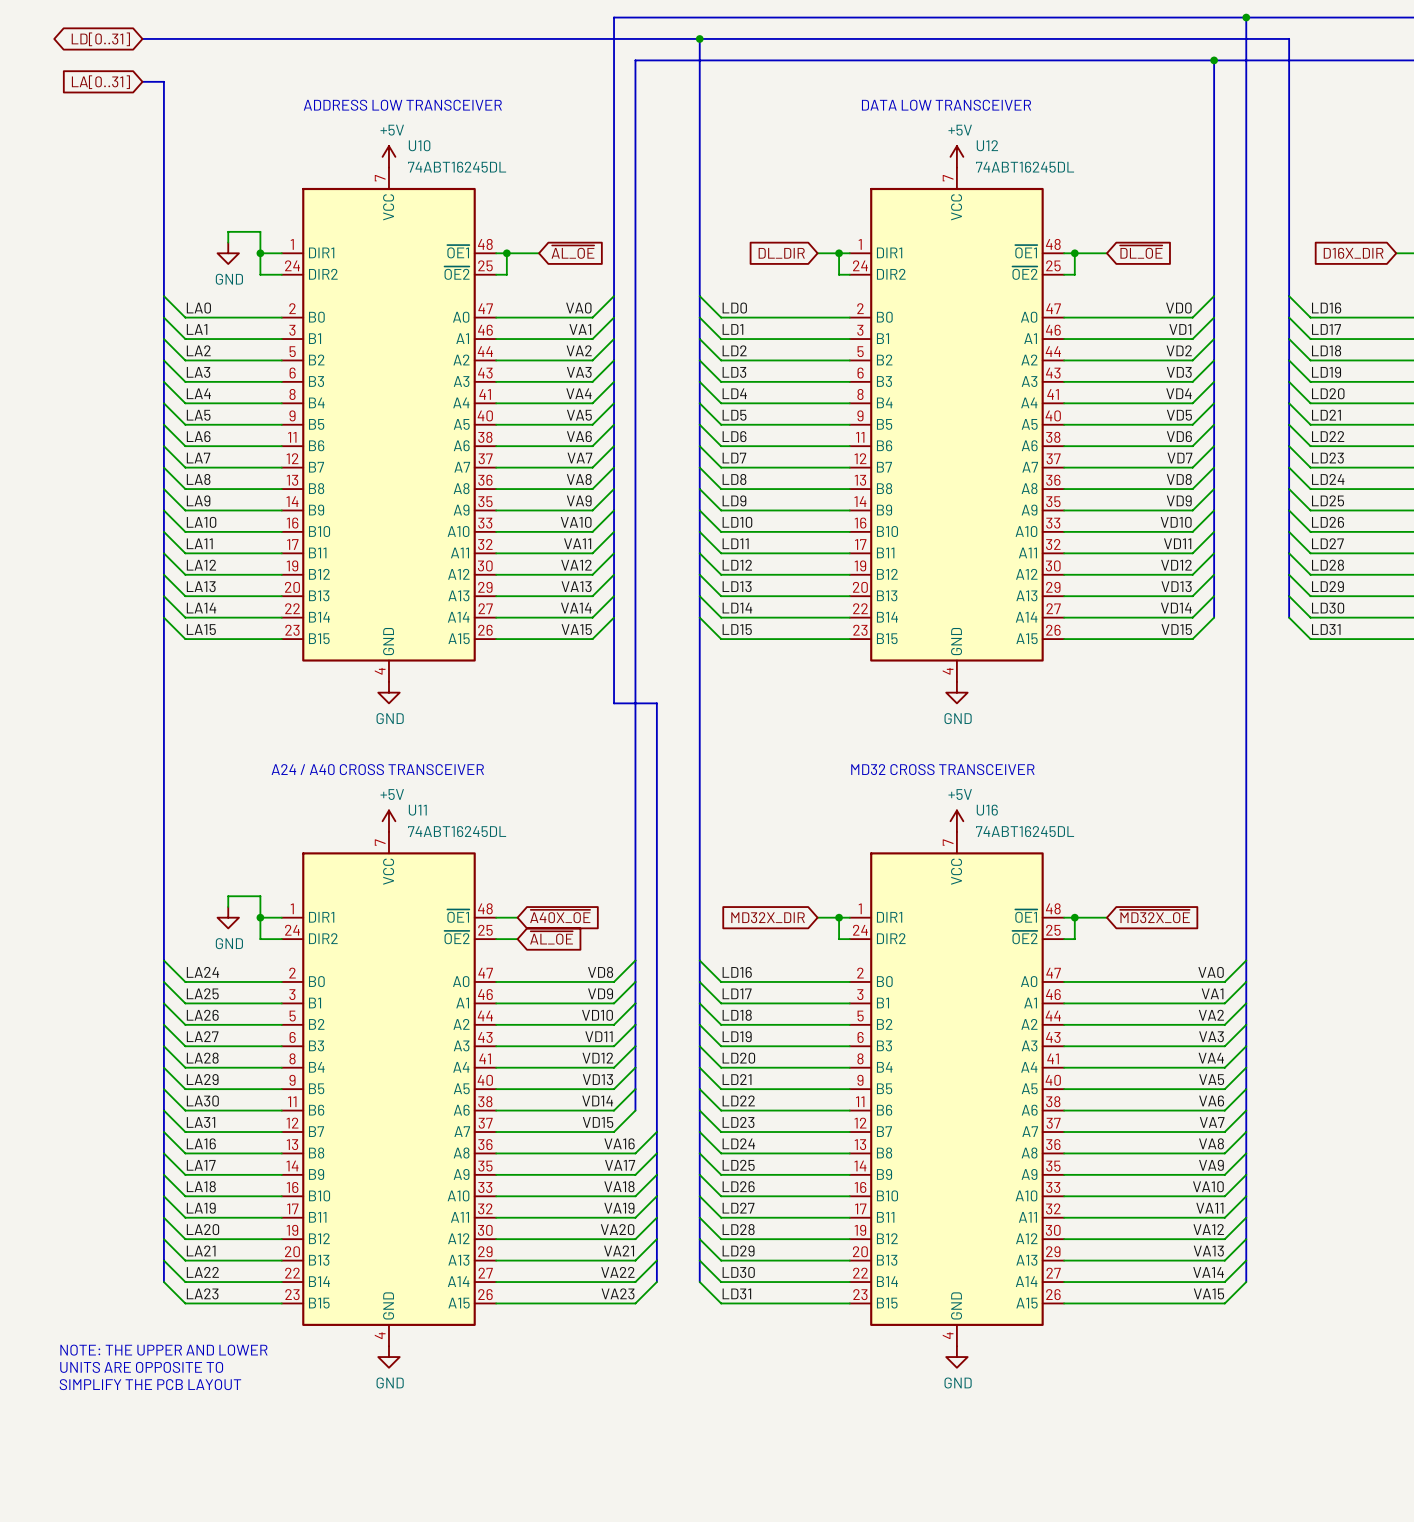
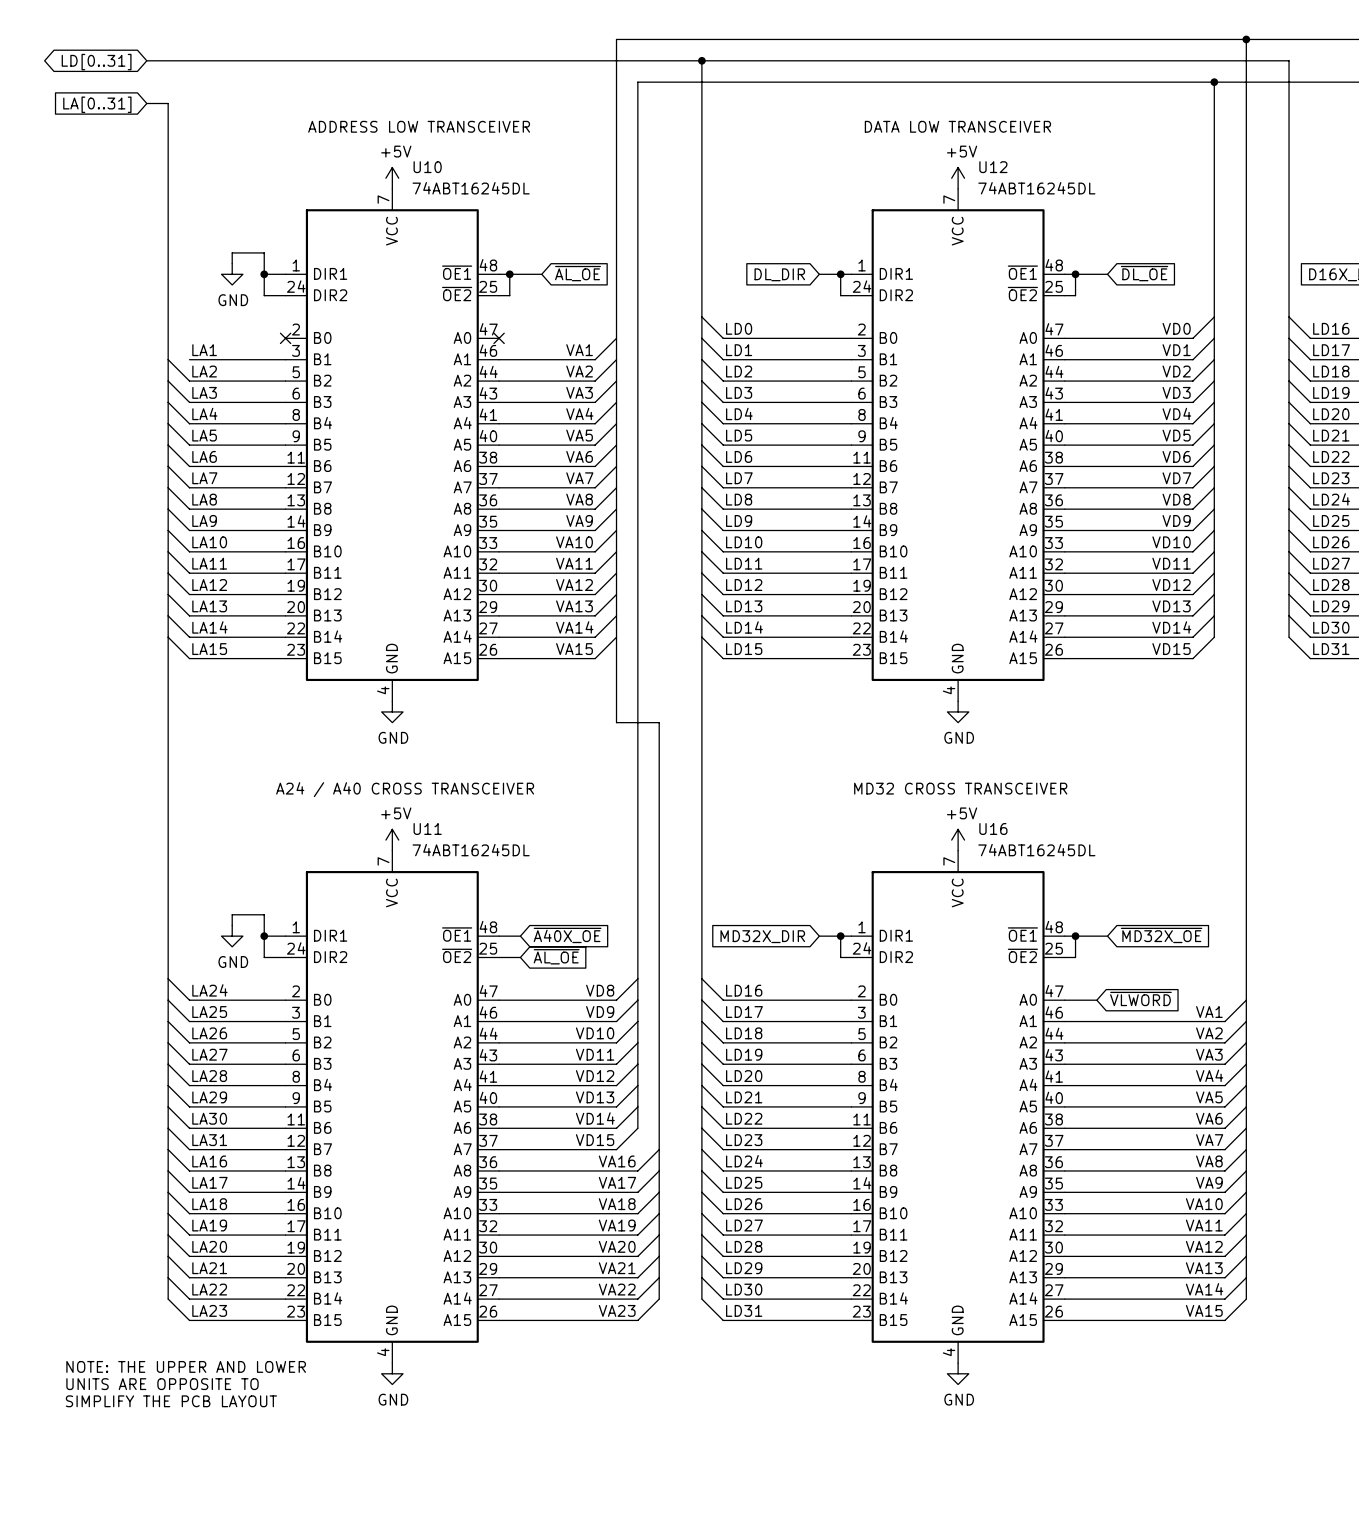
wire: (163, 296) (185, 317) (281, 317) -> none
wire: (614, 296) (592, 317) (496, 317) -> none
label: LA0 (198, 308) -> none
label: VA0 (578, 308) -> none
wire: (163, 317) (185, 339) -> none
no-connect mark: none -> (285, 338)
no-connect mark: none -> (499, 338)
wire: (1246, 960) (1224, 981) (1096, 981) -> none
label: VA0 (1211, 972) -> none
global label: none -> ~{VLWORD} (1140, 998)

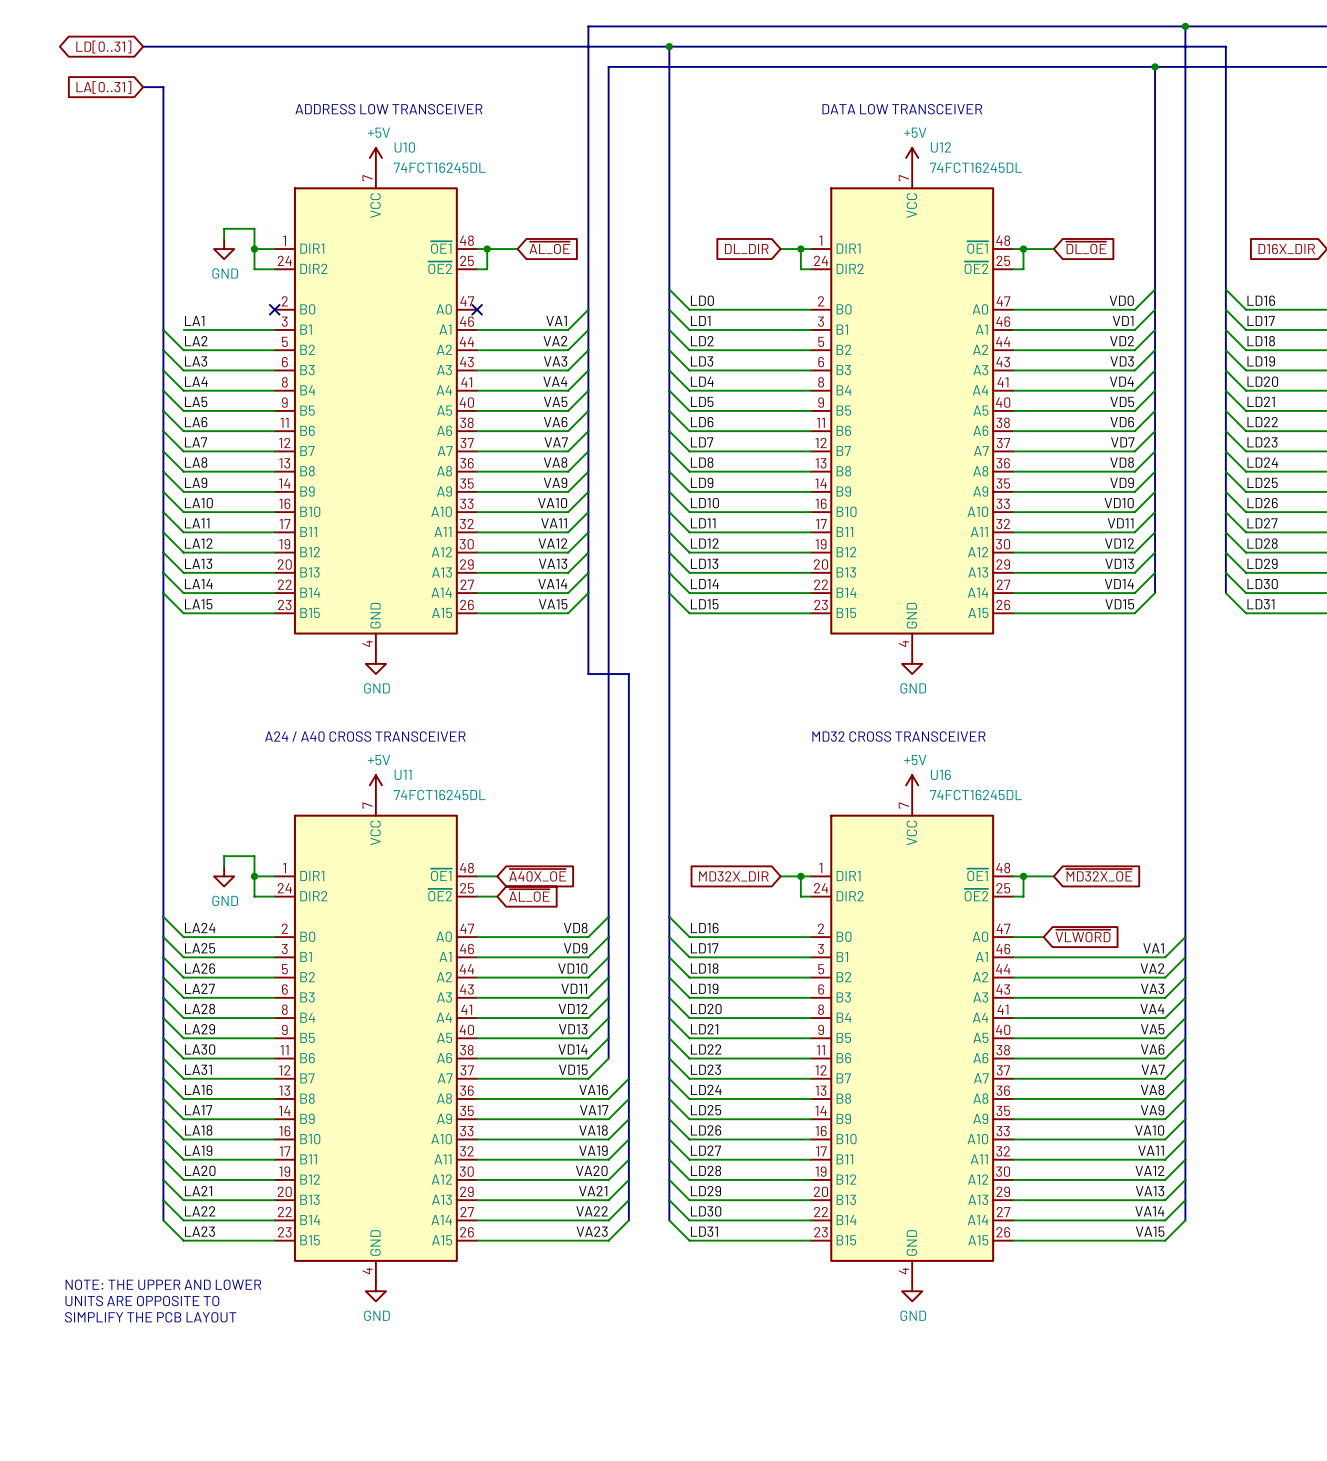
U10 value: 74ABT16245DL (471, 188) -> 74FCT16245DL (439, 167)
U12 value: 74ABT16245DL (1036, 188) -> 74FCT16245DL (976, 167)
U11 value: 74ABT16245DL (471, 850) -> 74FCT16245DL (439, 795)
U16 value: 74ABT16245DL (1036, 850) -> 74FCT16245DL (976, 795)

